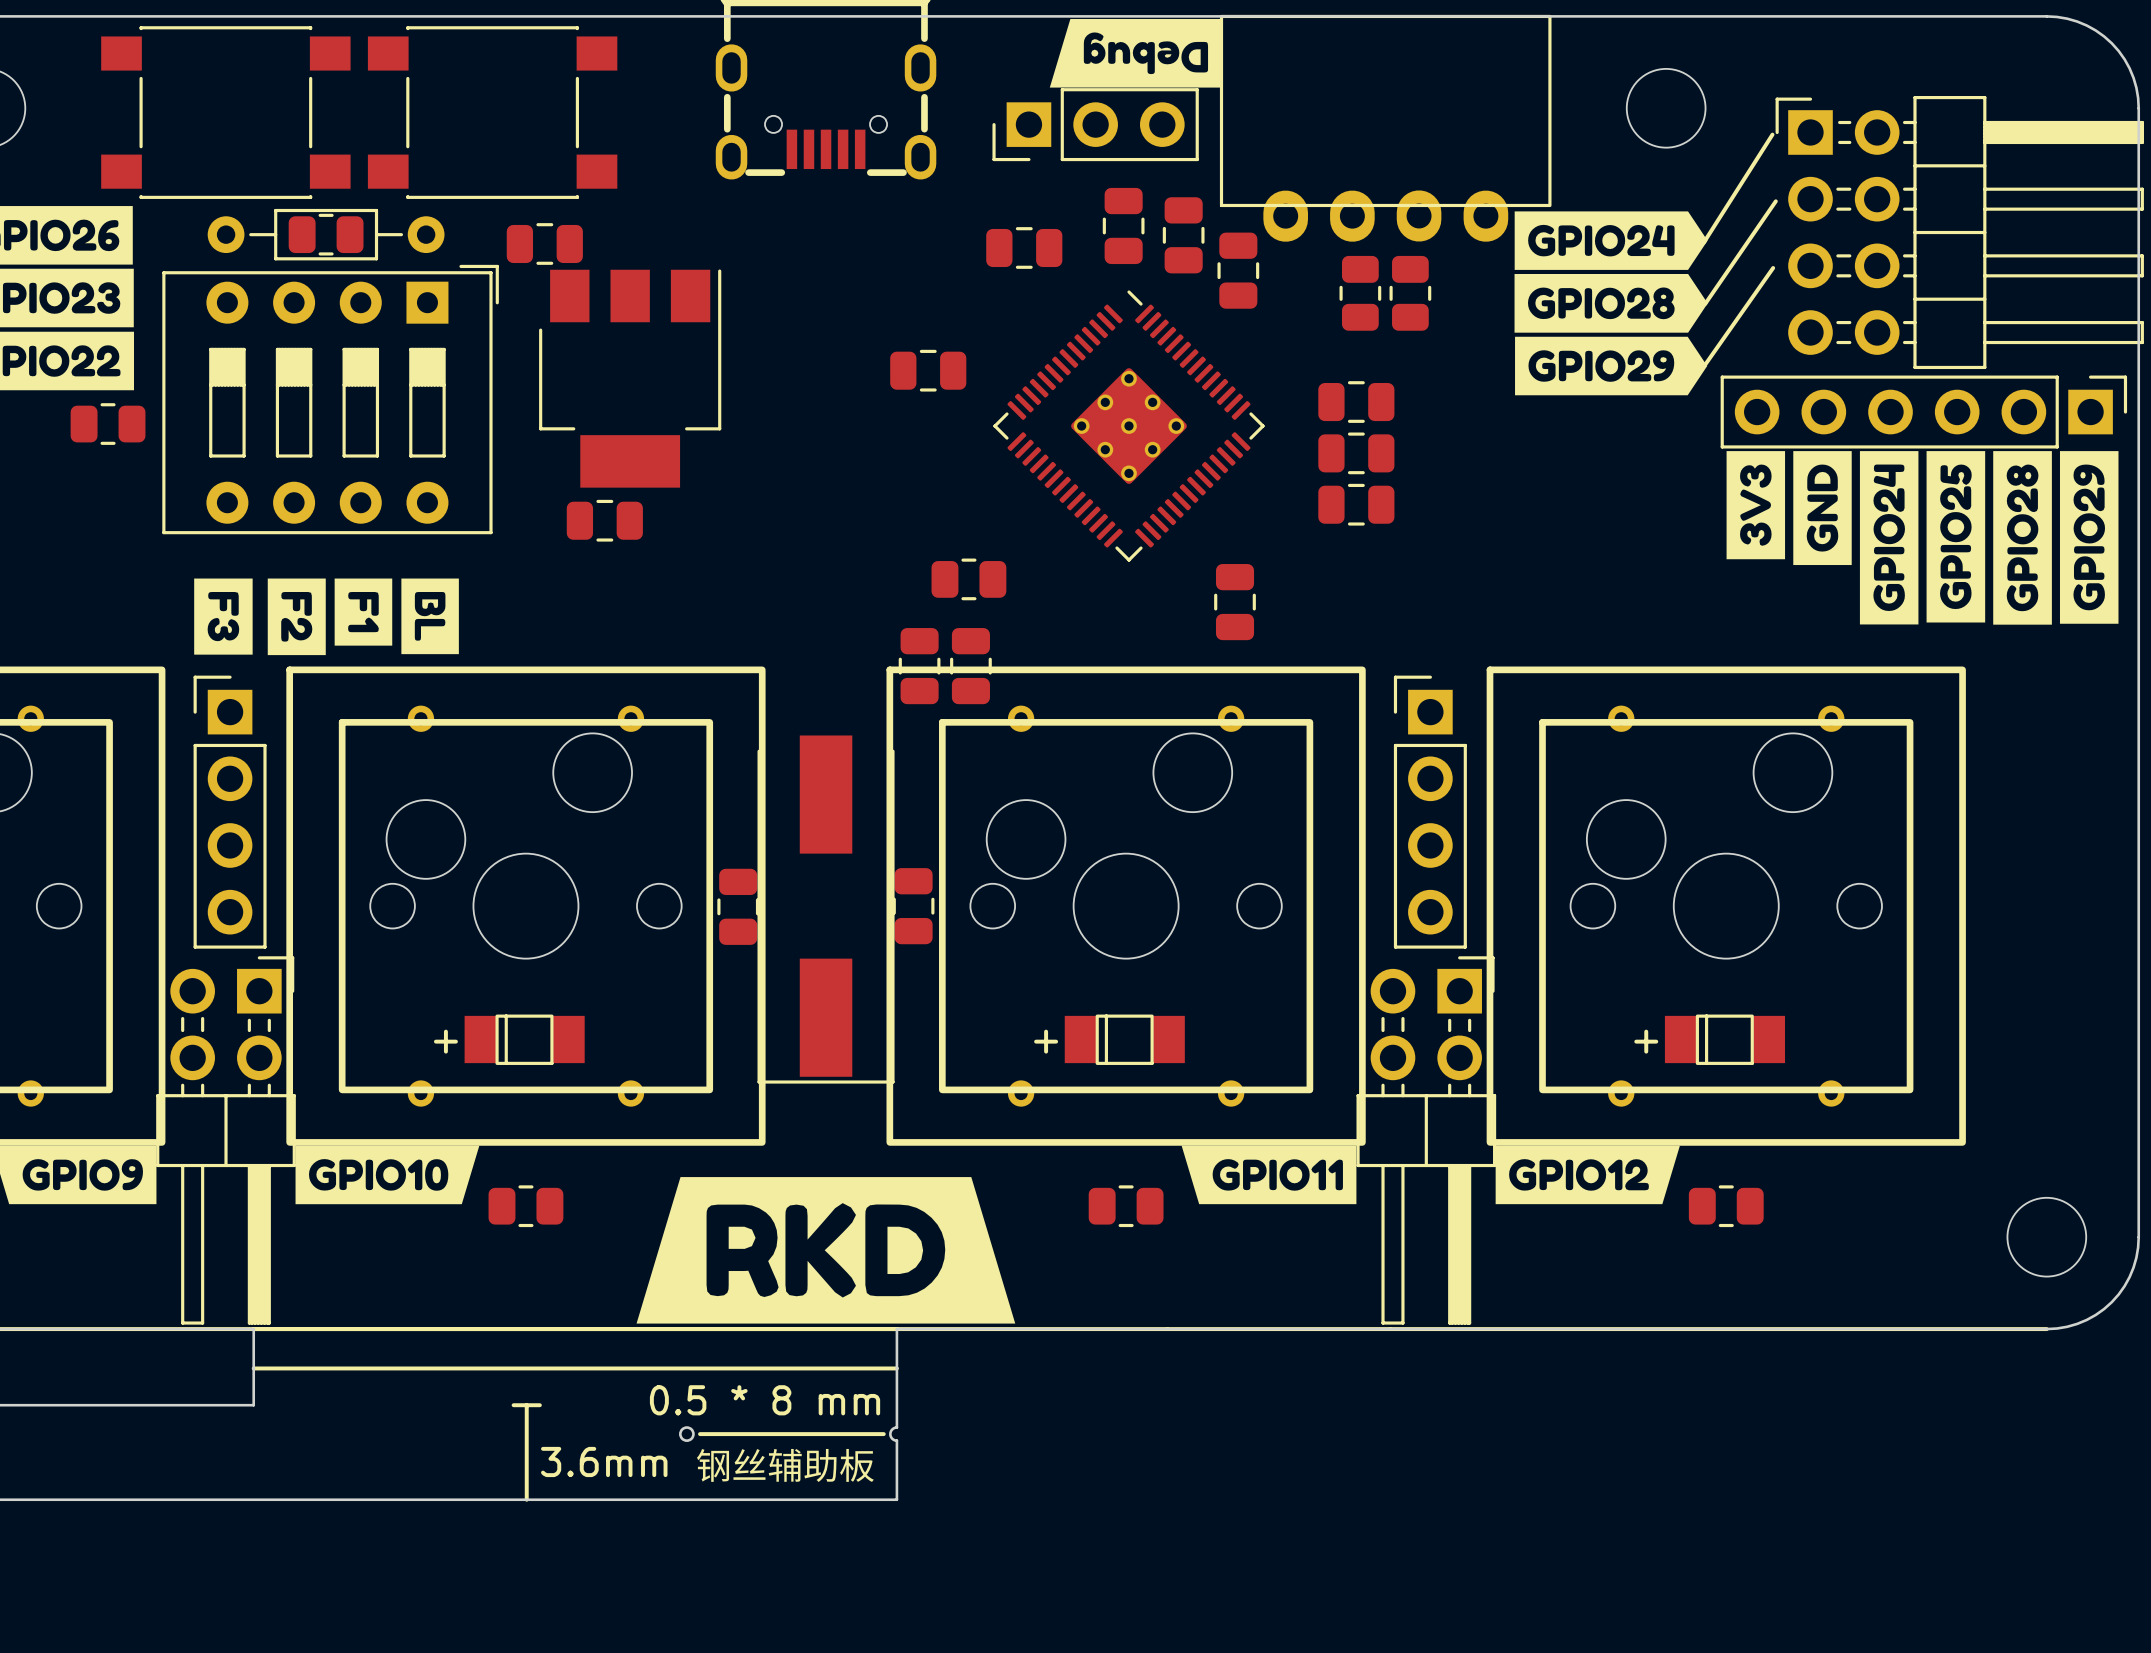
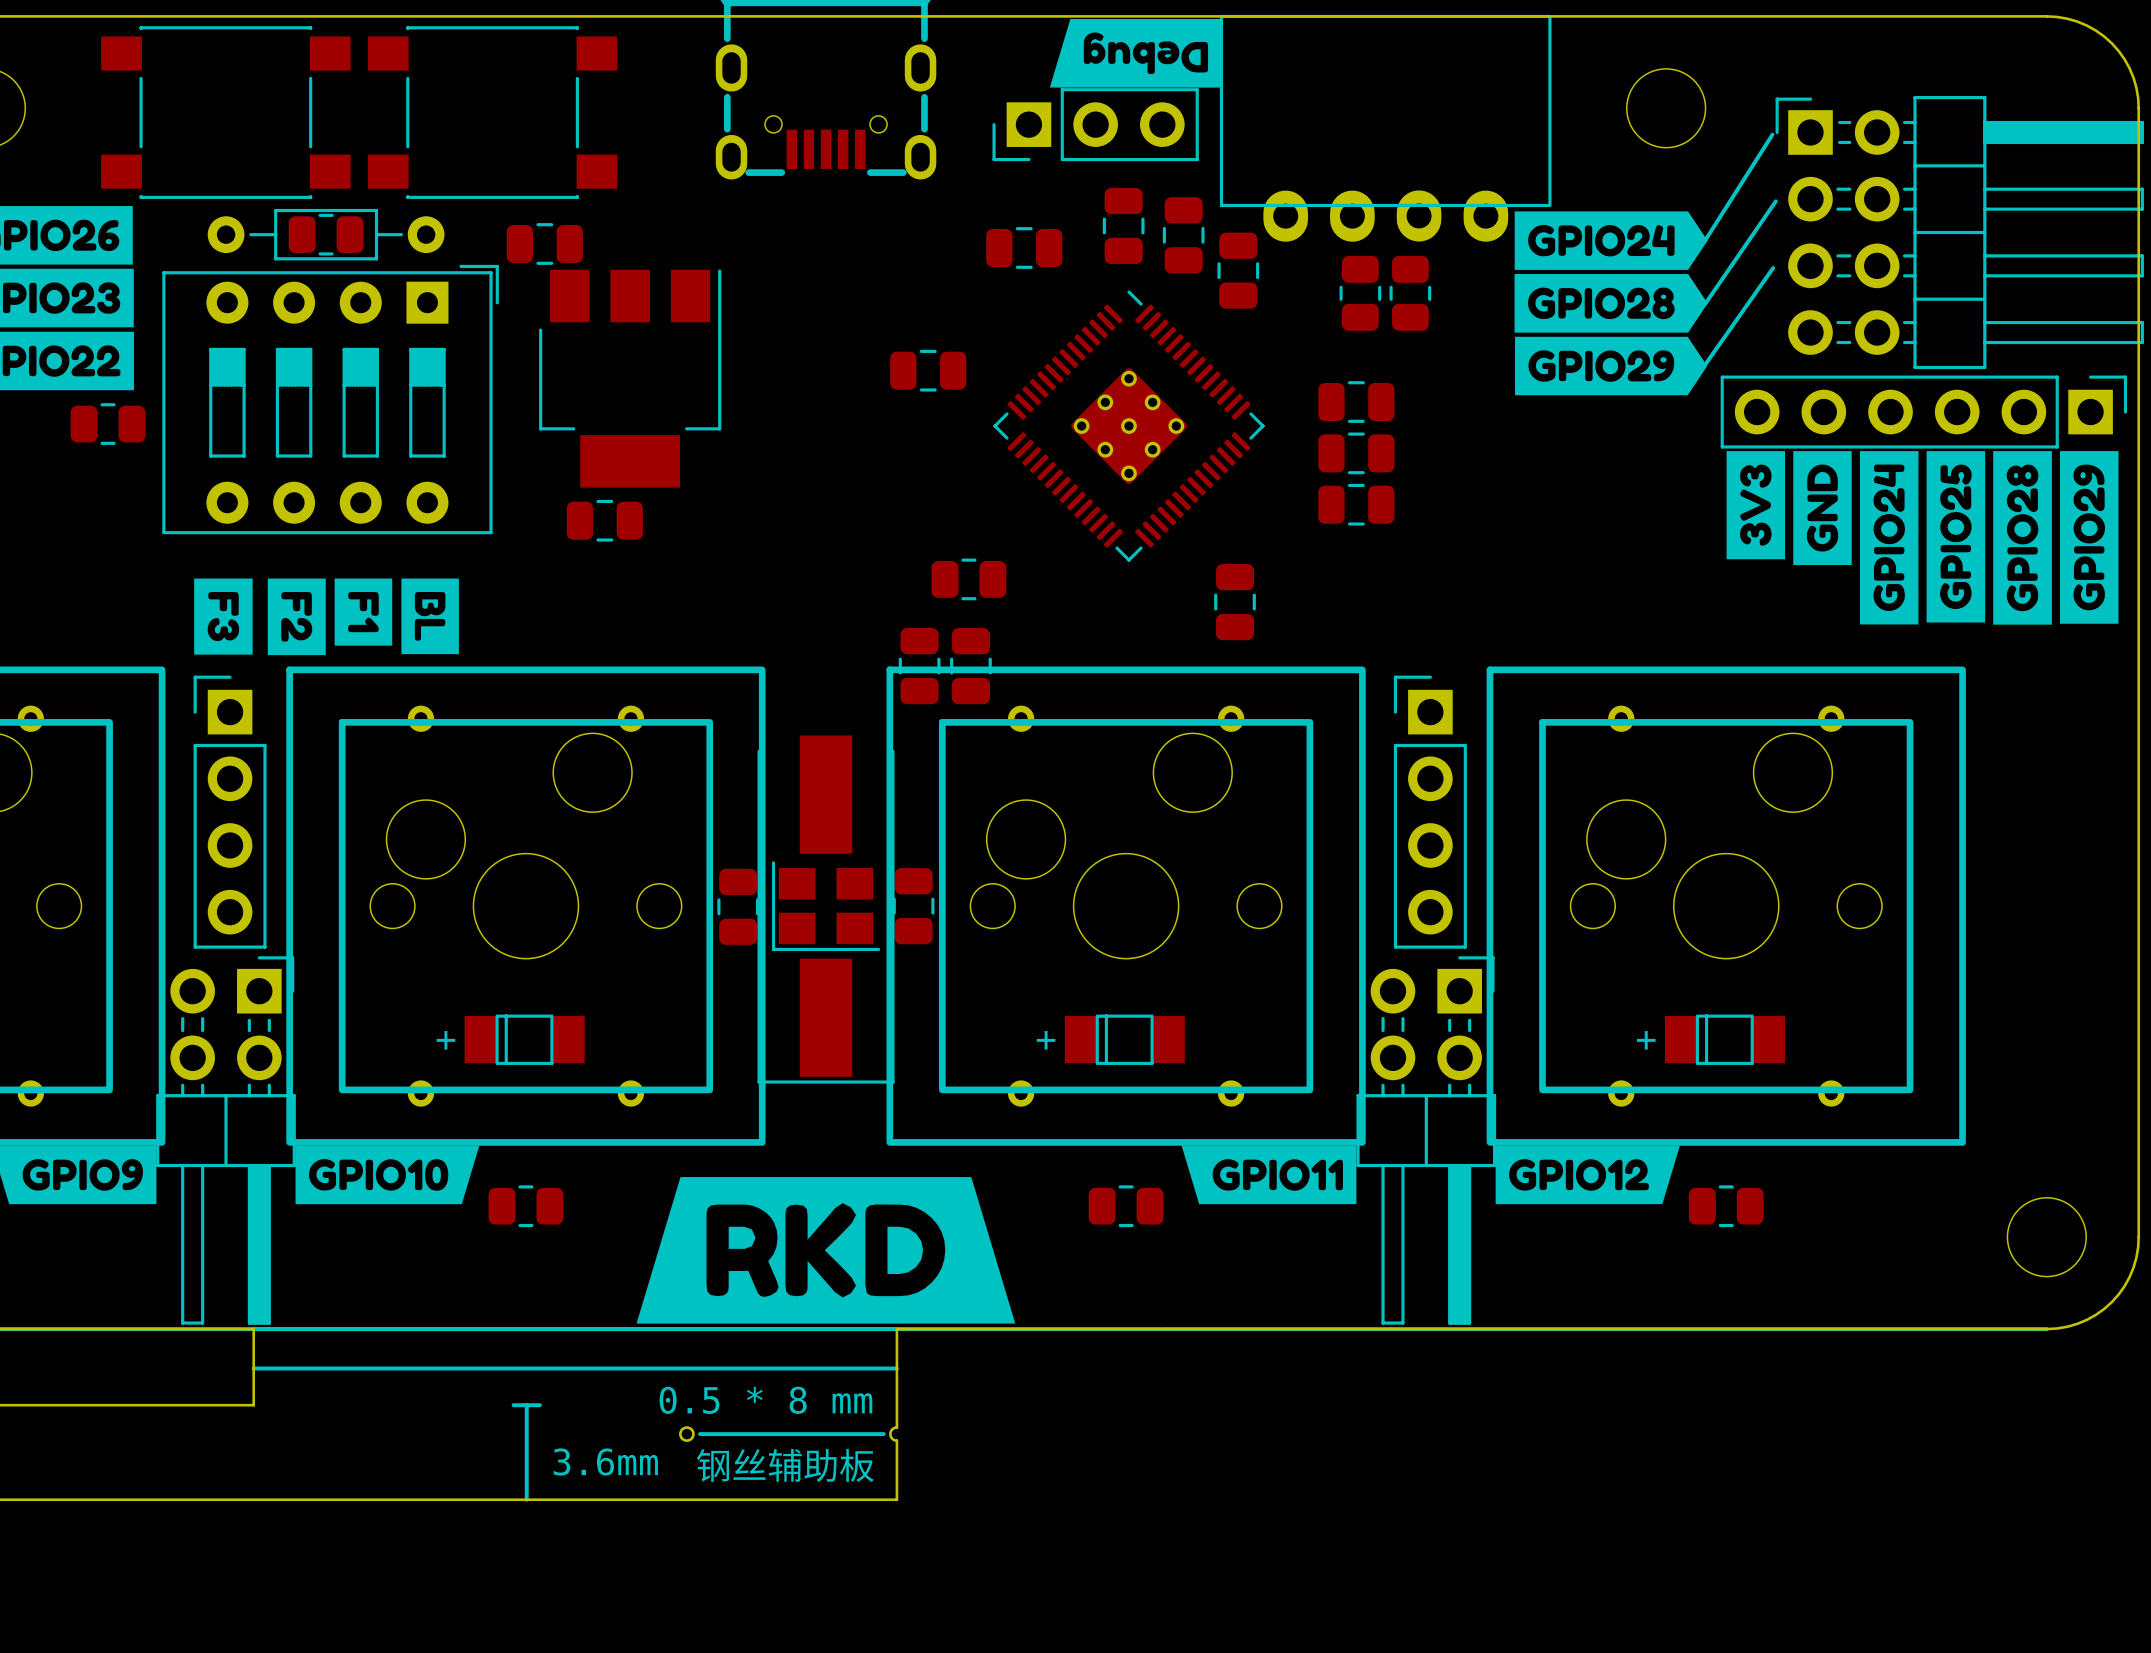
part: none -> (826, 906)

